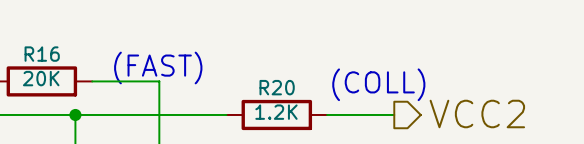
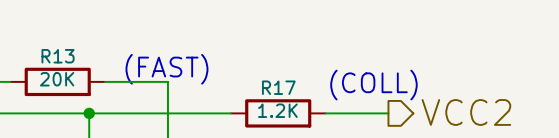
R16 name: R16 (42, 54) -> R13 (58, 56)
R20 name: R20 (277, 87) -> R17 (278, 87)

